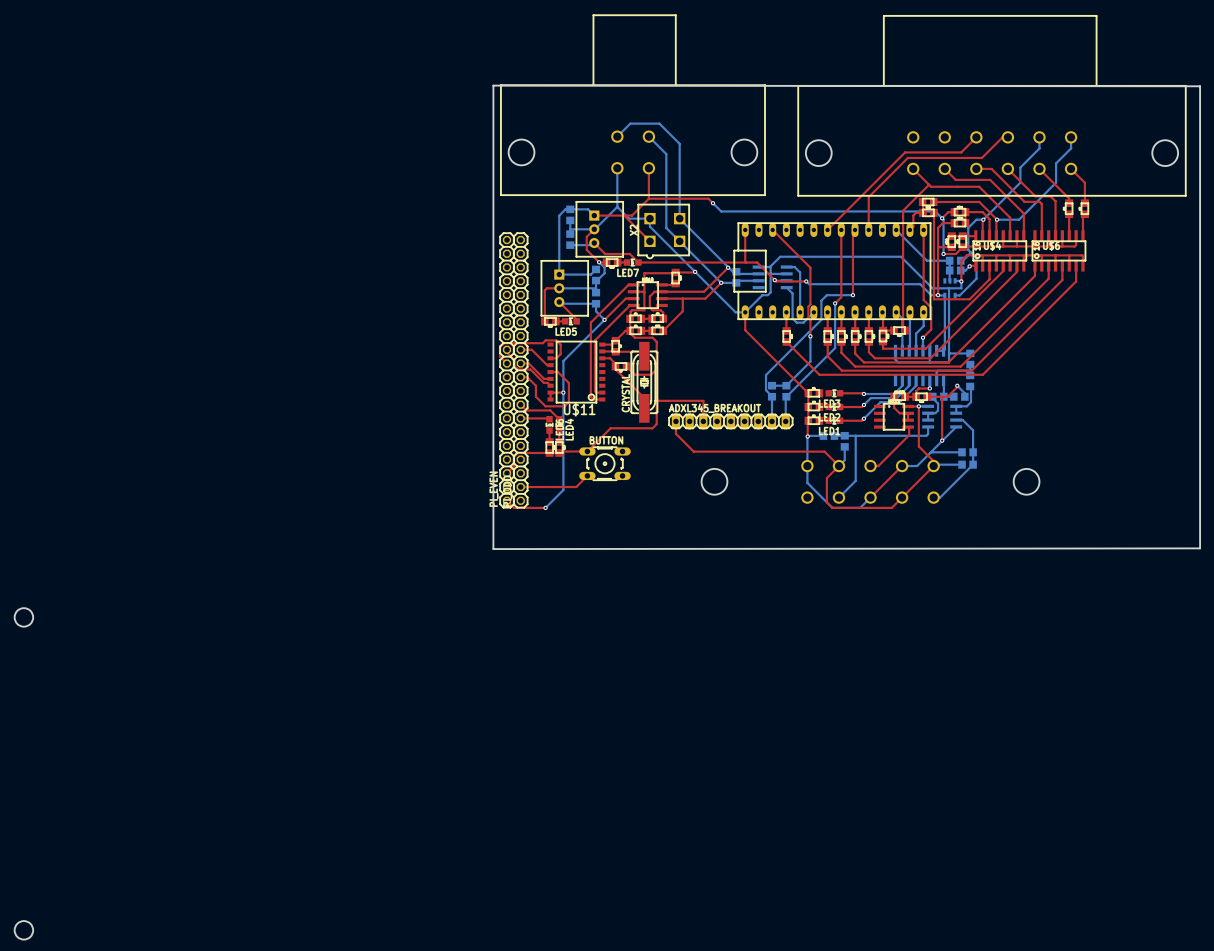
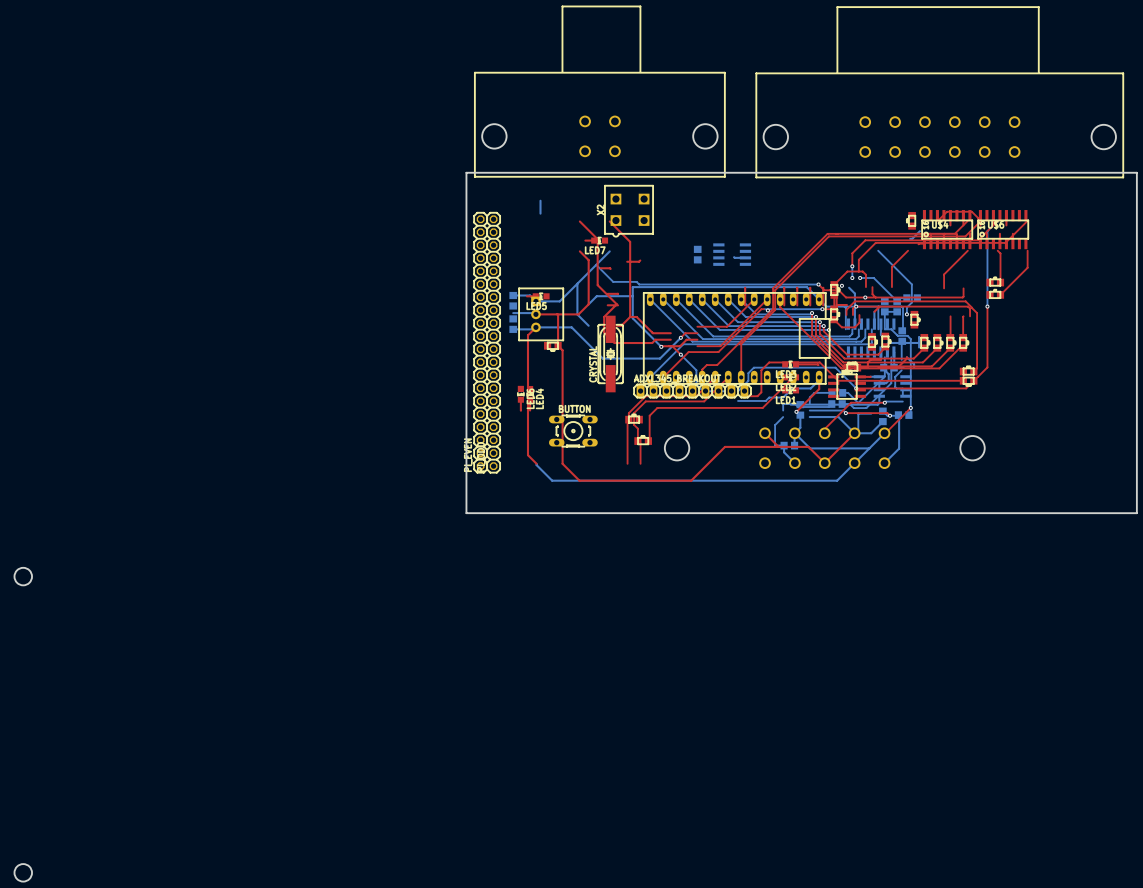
board edge: (493, 85) (1200, 86) (1200, 548) (493, 549) (493, 85) -> (466, 172) (466, 513) (1136, 513) (1136, 172) (466, 172)
bottom track: (617, 136) (630, 123) (659, 123) (679, 143) (679, 218) (732, 271) (738, 273) (758, 273) -> none
bottom track: (648, 136) (666, 154) (666, 227) (721, 282) (758, 280) -> none
top track: (976, 137) (961, 152) (905, 152) (827, 229) -> none
top track: (1007, 137) (1002, 137) (981, 157) (907, 157) (868, 197) (868, 229) -> none
bottom track: (1039, 137) (1039, 148) (1020, 167) (1020, 182) (983, 219) (976, 219) (968, 227) (968, 249) (976, 258) (976, 278) (959, 295) (955, 295) -> none
bottom track: (1071, 137) (1071, 148) (1056, 163) (1056, 182) (1019, 219) (997, 219) -> none
bottom track: (617, 168) (617, 206) -> none
top track: (648, 168) (648, 198) -> none
top track: (913, 168) (931, 186) (979, 186) (1010, 217) (1010, 236) -> none
top track: (944, 168) (955, 179) (990, 179) (1023, 213) (1023, 236) -> none
top track: (976, 168) (991, 168) (1024, 201) (1039, 201) (1041, 204) (1041, 236) -> none
top track: (1007, 168) (1035, 196) (1050, 196) (1055, 201) (1055, 236) -> none
top track: (1039, 168) (1069, 198) (1069, 203) -> none
top track: (1071, 168) (1084, 182) (1084, 203) -> none
top track: (929, 184) (903, 210) (903, 328) (905, 330) -> none
top track: (648, 198) (632, 215) (594, 215) -> none
top track: (648, 198) (708, 198) (712, 203) -> none
top track: (922, 201) (922, 212) (916, 212) (913, 215) (913, 226) (909, 229) -> none
part rotation: 0° (928, 201) -> 90° clockwise (834, 289)
part position: (928, 201) -> (834, 289)
top track: (933, 201) (979, 201) (997, 219) (996, 236) -> none
bottom track: (712, 203) (721, 211) (935, 211) (943, 219) (943, 254) -> none
via: (712, 203) -> none
bottom track: (617, 206) (594, 229) (570, 229) -> none
bottom track: (617, 206) (629, 218) (649, 218) (649, 226) (735, 312) (745, 312) (762, 295) (767, 295) (770, 292) (770, 266) -> none
part rotation: 0° (1069, 208) -> 90° clockwise (995, 282)
part position: (1069, 208) -> (995, 282)
part rotation: 0° (1084, 208) -> 90° clockwise (995, 294)
part position: (1084, 208) -> (995, 294)
part rotation: 0° (928, 212) -> 90° clockwise (834, 314)
part position: (928, 212) -> (834, 314)
top track: (933, 212) (933, 292) -> none
top track: (954, 212) (948, 212) (942, 218) -> none
part side: top (960, 212) -> bottom (912, 298)
part: (570, 214) -> none
top track: (1069, 214) (1069, 236) -> none
top track: (1084, 214) (1082, 216) (1082, 236) -> none
bottom track: (594, 215) (588, 209) (565, 209) (559, 215) (559, 274) (590, 274) (596, 269) -> none
top track: (624, 215) (649, 241) -> none
via: (942, 218) -> none
top track: (983, 219) (982, 236) -> none
via: (983, 219) -> none
via: (997, 219) -> none
top track: (954, 223) (942, 223) (938, 227) (938, 247) (951, 247) -> none
part side: top (960, 223) -> bottom (897, 306)
top track: (965, 223) (965, 212) (982, 212) (989, 219) (989, 236) -> none
top track: (594, 229) (586, 236) (586, 249) (599, 262) (607, 263) -> none
part: (599, 229) -> none
top track: (745, 229) (745, 262) -> none
top track: (772, 229) (810, 267) (810, 304) (808, 306) (810, 336) -> none
top track: (841, 229) (841, 297) (835, 303) -> none
top track: (855, 229) (852, 232) (852, 295) -> none
bottom track: (896, 229) (926, 260) (949, 260) (950, 280) -> none
top track: (923, 229) (923, 299) (931, 307) (931, 329) (928, 332) -> none
top track: (1076, 236) (1074, 246) (963, 246) (955, 254) (943, 254) -> none
part: (570, 239) -> none
part side: top (951, 241) -> bottom (884, 306)
top track: none -> (937, 220) (947, 211) (971, 211) (978, 218) (978, 223) (965, 236) (828, 236) (775, 290) (775, 310) (741, 343) (741, 377)
bottom track: none -> (997, 220) (987, 231) (987, 306)
top track: none -> (997, 220) (978, 240) (865, 240) (852, 253) (852, 266)
top track: none -> (1027, 220) (1005, 242) (875, 242) (858, 259) (858, 271)
top track: none -> (579, 221) (597, 239) (597, 285) (616, 304) (604, 316) (604, 332) (614, 343) (652, 343) (655, 339) (670, 339)
top track: none -> (609, 221) (630, 241) (630, 316)
bottom track: (594, 243) (592, 245) (570, 245) -> none
top track: (594, 243) (605, 254) (629, 254) (638, 262) (757, 262) (776, 281) (806, 281) -> none
top track: (938, 247) (938, 295) -> none
via: (943, 254) -> none
top track: (966, 255) (961, 260) (961, 281) -> (916, 233) (827, 233) (773, 288) (773, 309) (717, 365) (706, 365) (702, 369) (702, 377)
top track: (1007, 255) (1082, 255) (1082, 265) -> (954, 233) (967, 220)
part: (955, 260) -> none
bottom track: (599, 262) (604, 267) (604, 273) (596, 280) (596, 292) -> none
via: (599, 262) -> none
part position: (612, 262) -> (552, 345)
top track: (989, 265) (989, 279) (969, 299) (933, 299) (933, 292) -> none
top track: (1003, 265) (1003, 271) (925, 348) (883, 348) (883, 341) -> none
top track: (1016, 265) (1016, 271) (930, 358) (874, 358) (868, 352) (868, 342) -> none
top track: (1034, 265) (1034, 275) (948, 362) (863, 362) (855, 353) (855, 342) -> none
top track: (1048, 265) (1048, 278) (960, 366) (855, 366) (841, 352) (841, 342) -> none
top track: (1062, 265) (1062, 280) (971, 370) (841, 370) (827, 356) (827, 342) -> none
top track: (1076, 265) (1076, 281) (982, 374) (819, 374) (786, 342) -> none
bottom track: (969, 266) (965, 270) (960, 270) -> none
via: (969, 266) -> none
top track: (728, 267) (704, 291) (654, 291) (649, 296) (649, 307) (652, 310) (660, 310) (663, 312) (663, 318) -> none
via: (728, 267) -> none
bottom track: (758, 267) (769, 267) (780, 256) (901, 256) (932, 288) (961, 288) (961, 281) (955, 280) -> none
bottom track: (786, 267) (794, 267) (800, 272) (800, 312) -> none
part: (955, 270) -> none
top track: (695, 271) (644, 273) (644, 310) (632, 310) (630, 318) (630, 315) -> none
via: (695, 271) -> none
part rotation: 0° (832, 271) -> 180° (736, 338)
top track: none -> (579, 251) (588, 260) (588, 304) (578, 314) (535, 314)
bottom track: none -> (609, 251) (559, 301) (535, 301) (530, 295) (513, 295)
bottom track: (770, 273) (786, 273) -> none
bottom track: none -> (878, 250) (911, 284) (911, 302) (906, 307) (906, 314)
top track: none -> (908, 250) (891, 266) (891, 287)
top track: none -> (967, 250) (944, 274) (944, 288)
top track: none -> (997, 250) (1000, 253) (1000, 282)
top track: none -> (1027, 250) (1027, 267) (1000, 294)
part: (596, 275) -> none
part: (675, 278) -> none
via: (774, 280) -> none
bottom track: (806, 281) (809, 284) (920, 284) (931, 295) (944, 295) (944, 349) (936, 350) -> none
via: (806, 281) -> none
via: (961, 281) -> none
top track: (721, 282) (705, 298) (661, 298) -> none
via: (721, 282) -> none
top track: (633, 284) (628, 284) (590, 322) (590, 396) (593, 399) (602, 399) -> none
bottom track: (786, 287) (792, 293) (792, 318) (796, 322) (803, 322) (813, 312) -> none
bottom track: (559, 288) (596, 288) -> none
top track: (559, 288) (546, 288) (544, 290) (544, 321) -> none
part position: (564, 288) -> (541, 314)
bottom track: none -> (596, 264) (613, 281) (636, 281) (639, 284) (818, 284)
bottom track: (949, 288) (949, 362) (898, 362) (895, 359) (895, 350) -> none
part: (950, 288) -> none
bottom track: none -> (852, 266) (852, 278)
via: none -> (852, 266)
part: (647, 295) -> none
bottom track: (852, 295) (826, 295) (821, 300) (821, 319) (766, 375) (766, 390) (772, 396) (772, 421) -> none
via: (852, 295) -> none
via: (938, 295) -> none
part: (596, 298) -> none
top track: (633, 298) (625, 298) (604, 319) -> none
top track: (682, 298) (682, 311) (663, 330) -> none
bottom track: (559, 302) (560, 303) (596, 303) (596, 311) (604, 319) (563, 361) (563, 490) (545, 507) -> none
top track: (559, 302) (576, 321) -> none
via: none -> (852, 278)
bottom track: none -> (860, 278) (873, 278) (897, 301) (900, 298) (906, 298)
via: none -> (860, 278)
bottom track: (835, 303) (835, 348) (785, 397) (785, 421) -> none
via: (835, 303) -> none
top track: (633, 305) (629, 305) (594, 340) (594, 391) (602, 392) -> none
bottom track: none -> (577, 283) (577, 314) (588, 325)
top track: none -> (818, 284) (824, 290) (838, 290) (846, 297) (962, 297) (963, 288)
via: none -> (818, 284)
top track: none -> (834, 284) (847, 271) (862, 271) (865, 274) (865, 287)
via: none -> (841, 285)
top track: none -> (872, 287) (872, 294) (875, 297)
top track: (745, 312) (745, 330) (808, 393) (807, 436) -> none
bottom track: (909, 312) (909, 350) -> none
bottom track: (923, 312) (923, 326) (916, 333) (916, 350) -> none
top track: (630, 316) (630, 333) (634, 337) (652, 337) (656, 341) (656, 424) (652, 428) (610, 428) (587, 451) (549, 453) -> none
part: (635, 318) -> none
part: (657, 318) -> none
via: (604, 319) -> none
top track: none -> (834, 295) (834, 309) (822, 309)
part: (550, 321) -> none
bottom track: none -> (632, 296) (596, 296) (588, 304)
via: none -> (865, 297)
bottom track: none -> (650, 299) (692, 341) (861, 341) (865, 337) (865, 329)
bottom track: none -> (663, 299) (702, 339) (856, 339) (858, 336) (858, 329)
bottom track: none -> (676, 299) (713, 336) (849, 336) (852, 333) (852, 329)
bottom track: none -> (689, 299) (719, 329) (828, 329)
bottom track: none -> (702, 299) (728, 326) (823, 326)
bottom track: none -> (715, 299) (738, 322) (819, 322)
bottom track: none -> (728, 299) (745, 316) (815, 316)
bottom track: none -> (741, 299) (756, 314) (812, 313)
top track: none -> (754, 299) (726, 326) (697, 326)
top track: none -> (767, 299) (720, 346) (697, 346)
top track: none -> (780, 299) (780, 307) (841, 368) (939, 368) (959, 348) (963, 348)
part: none -> (513, 300)
top track: (630, 330) (625, 330) (611, 344) (602, 344) -> none
part: (635, 330) -> none
part: (657, 330) -> none
part rotation: 0° (899, 330) -> 90° clockwise (914, 319)
part position: (899, 330) -> (914, 319)
bottom track: none -> (844, 306) (845, 329)
via: none -> (856, 306)
bottom track: none -> (878, 306) (878, 329)
top track: none -> (987, 306) (987, 367) (966, 388) (856, 388)
via: none -> (987, 306)
bottom track: none -> (763, 309) (822, 309)
top track: none -> (763, 309) (761, 309) (718, 352) (688, 352) (663, 377)
via: none -> (822, 309)
part position: (786, 336) -> (963, 342)
bottom track: (810, 336) (810, 361) (786, 385) (772, 385) -> none
part position: (827, 336) -> (950, 342)
part position: (841, 336) -> (937, 342)
part position: (855, 336) -> (924, 342)
part position: (868, 336) -> (885, 341)
part position: (883, 336) -> (871, 341)
via: (922, 337) -> none
bottom track: none -> (897, 311) (884, 311) (884, 329) (891, 329) (897, 335) (907, 335) (910, 339) (910, 413) (908, 415)
bottom track: none -> (513, 313) (535, 314)
top track: none -> (812, 313) (812, 335) (843, 366) (932, 366) (950, 348)
via: none -> (812, 313)
top track: none -> (557, 314) (558, 345) (562, 350) (562, 463) (579, 480) (691, 480) (725, 446) (808, 446) (824, 463)
via: none -> (906, 314)
top track: none -> (846, 315) (846, 309) (854, 301) (965, 301) (977, 313) (977, 368) (973, 371)
top track: none -> (852, 315) (854, 306) (967, 306) (970, 308) (970, 316)
top track: none -> (859, 315) (859, 322) (854, 327) (841, 327) (834, 319)
top track: none -> (950, 316) (950, 337)
top track: none -> (963, 316) (963, 337)
top track: none -> (630, 316) (621, 325) (616, 325)
top track: none -> (630, 316) (636, 316) (652, 333) (670, 333)
top track: none -> (815, 316) (815, 335) (843, 362) (922, 362) (937, 348)
via: none -> (815, 316)
part: (615, 346) -> none
top track: none -> (819, 322) (819, 333) (844, 358) (913, 358) (924, 348)
via: none -> (819, 322)
top track: (506, 349) (518, 369) (530, 369) (543, 382) (547, 382) (550, 385) -> none
top track: (520, 349) (531, 349) (547, 365) (550, 365) -> none
part: none -> (513, 324)
top track: (602, 351) (639, 351) (644, 356) -> none
top track: none -> (823, 326) (823, 331) (847, 354) (878, 354) (885, 346)
via: none -> (823, 326)
bottom track: (949, 352) (970, 353) -> none
top track: none -> (535, 327) (527, 335) (527, 455) (536, 463)
bottom track: none -> (513, 329) (571, 327) (602, 358) (660, 358) (680, 337)
via: none -> (828, 329)
bottom track: none -> (871, 329) (870, 344) (683, 344) (650, 377)
bottom track: none -> (902, 330) (901, 306) (826, 306) (806, 287) (632, 287) (632, 318) (661, 346)
top track: (550, 358) (556, 358) (560, 354) (560, 344) (556, 340) (545, 340) (542, 343) (504, 343) (499, 347) (499, 356) (506, 363) -> none
top track: (602, 358) (610, 358) (615, 363) (615, 369) (644, 398) (644, 408) -> none
part: (970, 358) -> none
top track: none -> (697, 333) (685, 333) (680, 337)
top track: (520, 363) (528, 363) (544, 378) (550, 378) -> none
via: none -> (680, 337)
part: (621, 366) -> none
top track: (626, 366) (634, 374) (651, 374) (656, 369) -> none
top track: none -> (697, 339) (686, 339) (680, 346) (661, 346)
bottom track: none -> (902, 341) (901, 359)
top track: (550, 372) (557, 372) (568, 383) (568, 402) (564, 406) (545, 406) (535, 396) (535, 385) (527, 377) (520, 377) -> none
U$11: (576, 372) -> none
via: none -> (661, 346)
top track: none -> (669, 346) (672, 346) (680, 354)
bottom track: (902, 380) (902, 385) (894, 393) (863, 393) -> none
bottom track: (909, 380) (909, 385) (896, 398) (870, 398) (863, 404) -> none
bottom track: (916, 380) (916, 385) (899, 402) (880, 402) (863, 418) -> none
part: (970, 380) -> none
bottom track: none -> (680, 354) (696, 370) (696, 384) (703, 391) (724, 391)
via: none -> (680, 354)
bottom track: none -> (884, 357) (884, 376) (858, 403) (848, 392) (842, 392)
bottom track: none -> (891, 357) (891, 383) (866, 408) (853, 408) (849, 404) (842, 404)
via: (957, 385) -> none
bottom track: (970, 386) (971, 402) (966, 406) (956, 406) (956, 413) -> none
via: (929, 388) -> none
part side: bottom (772, 391) -> top (634, 419)
part: (786, 391) -> none
top track: (563, 392) (550, 392) (550, 399) -> none
via: (563, 392) -> none
part: (813, 393) -> none
via: (863, 393) -> none
top track: (894, 396) (894, 407) (899, 413) (908, 413) (908, 420) -> none
part side: top (921, 396) -> bottom (902, 336)
top track: (942, 396) (942, 440) -> none
part: (959, 396) -> none
top track: (656, 399) (703, 400) (703, 421) -> none
bottom track: none -> (901, 370) (895, 376) (895, 387) (902, 388) (902, 395)
top track: none -> (963, 371) (963, 380) (838, 380) (819, 362) (769, 362) (761, 370) (761, 392) (757, 396) (741, 396)
part: none -> (968, 371)
top track: (520, 404) (526, 410) (550, 410) (559, 419) -> none
top track: (863, 404) (861, 407) (840, 407) -> none
via: (863, 404) -> none
top track: (918, 406) (918, 446) (933, 461) (933, 466) (891, 507) (832, 507) (826, 502) (826, 478) (838, 466) (824, 451) (693, 451) (675, 433) (675, 421) -> none
via: (918, 406) -> none
top track: none -> (715, 377) (696, 396) (645, 396) (628, 413) (627, 463)
top track: none -> (728, 377) (704, 401) (645, 401) (634, 413) (634, 424) (637, 428) (637, 441) (640, 443) (640, 463)
part: (813, 407) -> none
top track: none -> (793, 377) (762, 407) (657, 407) (649, 415) (648, 441)
bottom track: none -> (819, 377) (819, 380) (810, 388) (792, 388) (783, 397) (769, 397) (765, 400) (738, 400)
top track: none -> (819, 377) (819, 389) (796, 411)
part: none -> (968, 380)
top track: (520, 418) (549, 419) -> none
top track: (863, 418) (861, 420) (840, 420) -> none
via: (863, 418) -> none
bottom track: none -> (856, 388) (835, 367) (753, 367) (748, 373) (748, 380) (738, 391)
via: none -> (856, 388)
part: (813, 420) -> none
bottom track: (956, 420) (962, 420) (973, 430) (973, 464) (940, 497) (933, 497) -> (882, 411) (887, 415) (899, 415) (899, 448) (884, 463)
bottom track: none -> (832, 392) (814, 392) (809, 397) (809, 404)
part: none -> (837, 392)
bottom track: (956, 426) (917, 466) -> (882, 421) (868, 433)
top track: (908, 427) (909, 435) (878, 466) (870, 466) -> (884, 402) (851, 402) (824, 428) (824, 433)
bottom track: none -> (902, 401) (884, 402)
bottom track: none -> (830, 402) (831, 404) (828, 407) (798, 407) (795, 404) (783, 404) (783, 410)
via: none -> (884, 402)
bottom track: (823, 435) (807, 436) (807, 482) (832, 507) (860, 507) (870, 497) -> none
part: (828, 435) -> none
bottom track: (855, 435) (855, 480) (838, 497) -> (783, 417) (775, 425) (775, 445) (784, 445) (784, 452) (794, 463)
part: none -> (837, 404)
via: (807, 436) -> none
top track: none -> (910, 407) (884, 433)
via: none -> (910, 407)
via: (942, 440) -> none
bottom track: none -> (809, 410) (843, 410) (845, 413)
via: none -> (796, 411)
top track: none -> (845, 413) (887, 413) (890, 415)
via: none -> (845, 413)
bottom track: none -> (871, 413) (858, 413) (858, 433)
part: none -> (903, 415)
part: (549, 447) -> none
part: (559, 447) -> none
via: none -> (890, 415)
bottom track: none -> (809, 417) (838, 417) (854, 433)
part: none -> (882, 416)
bottom track: (930, 452) (962, 452) -> none
part: (967, 452) -> none
top track: (549, 453) (518, 453) (513, 457) (513, 466) (506, 473) -> none
bottom track: (962, 464) (933, 466) -> (536, 463) (552, 480) (837, 480) (884, 433)
part: (967, 464) -> none
top track: none -> (765, 433) (778, 446)
part: none -> (643, 441)
top track: (587, 475) (576, 487) (520, 487) -> none
part: none -> (789, 445)
bottom track: none -> (794, 445) (794, 433) (810, 448) (869, 448)
top track: (506, 500) (514, 507) (545, 507) -> none
via: (545, 507) -> none

